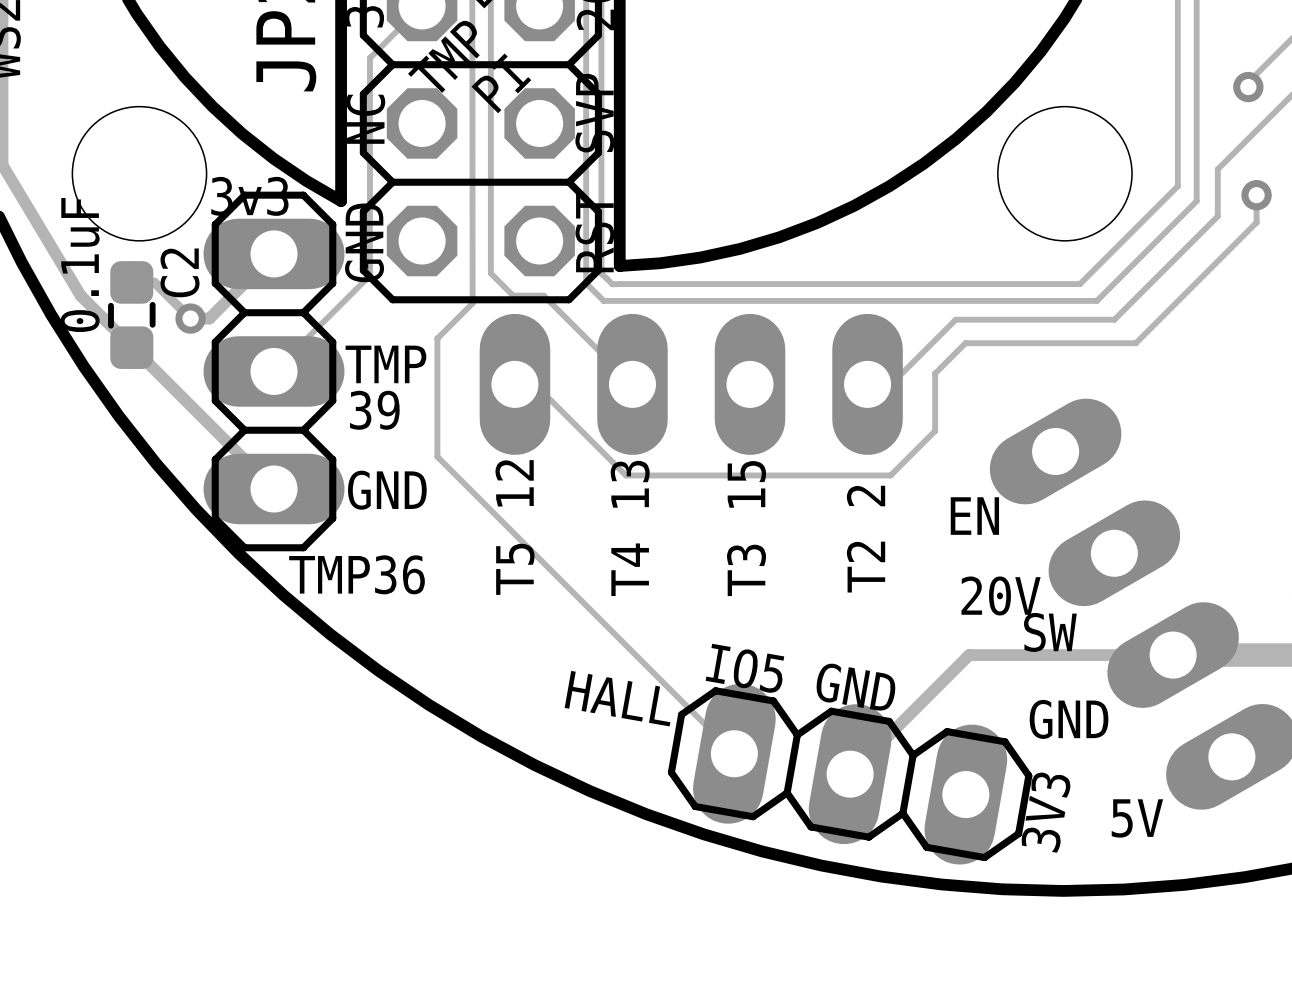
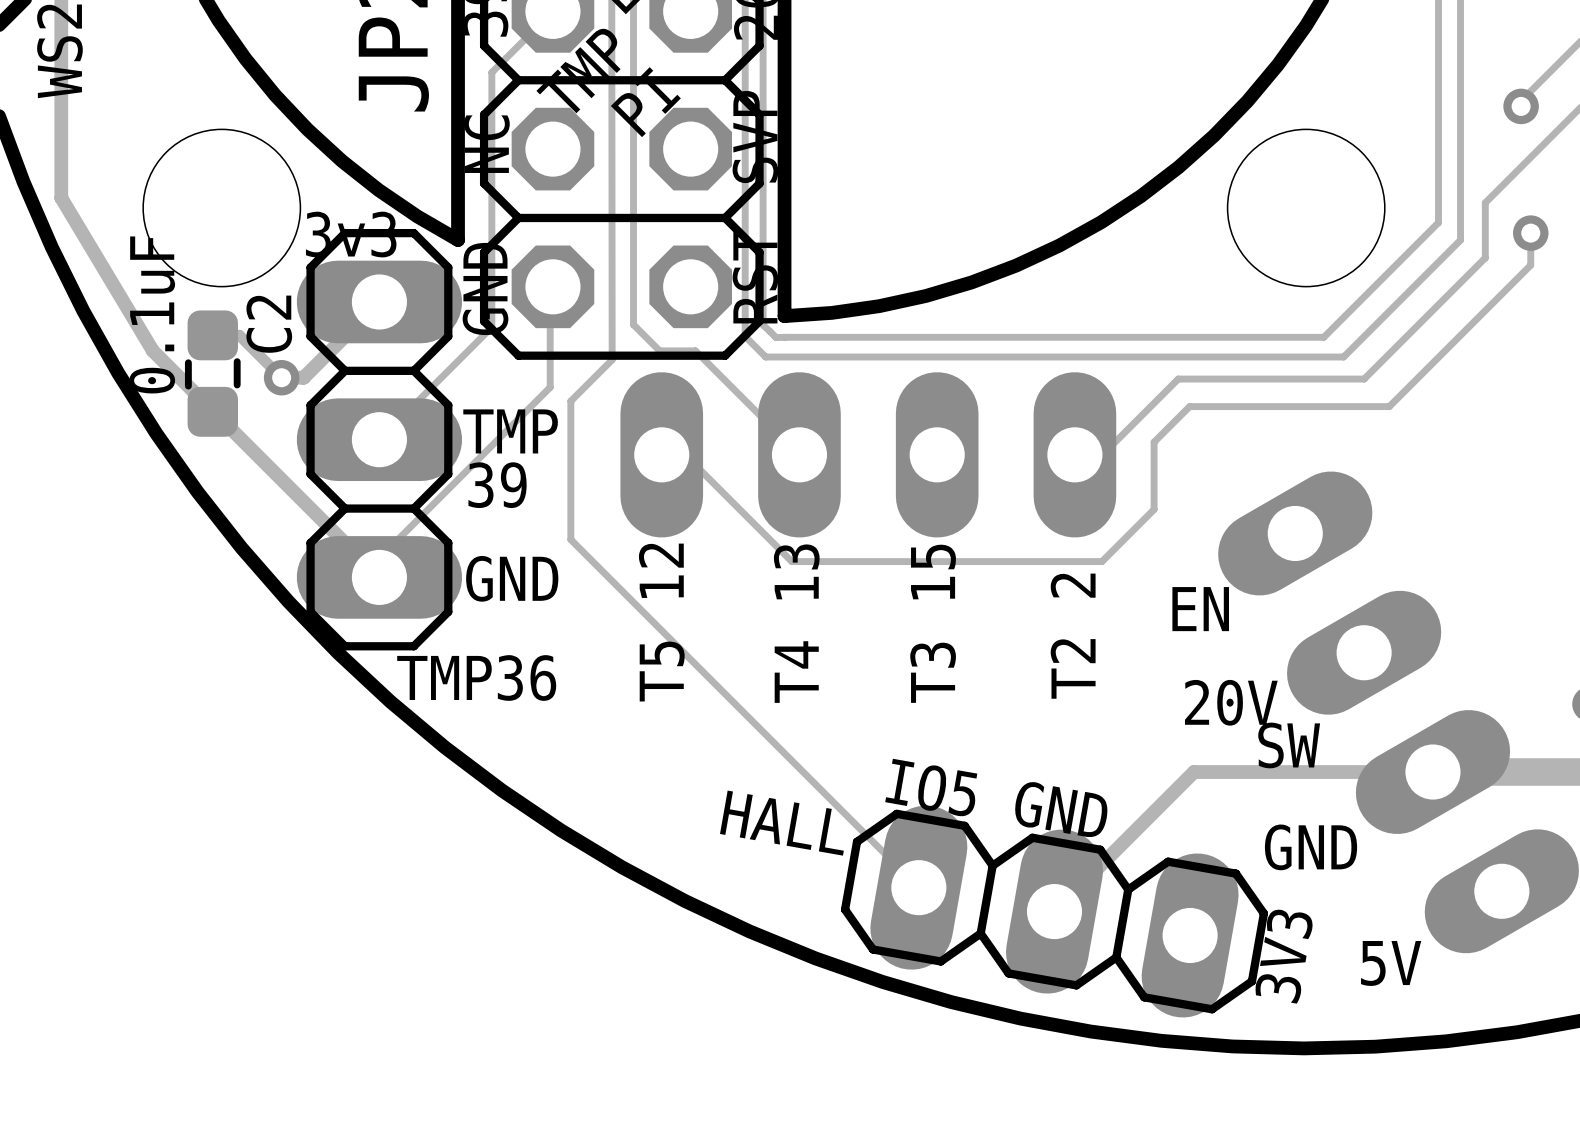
track: none -> (552, 286) (550, 287) (550, 387) (374, 562) (379, 577)

